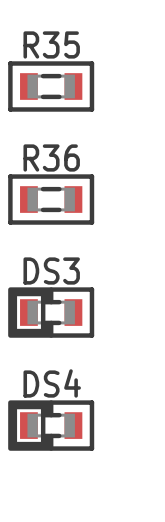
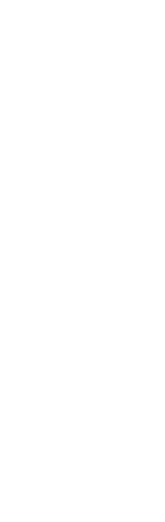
R35: (51, 86) -> none
R36: (51, 199) -> none
DS3: (51, 312) -> none
DS4: (51, 425) -> none

